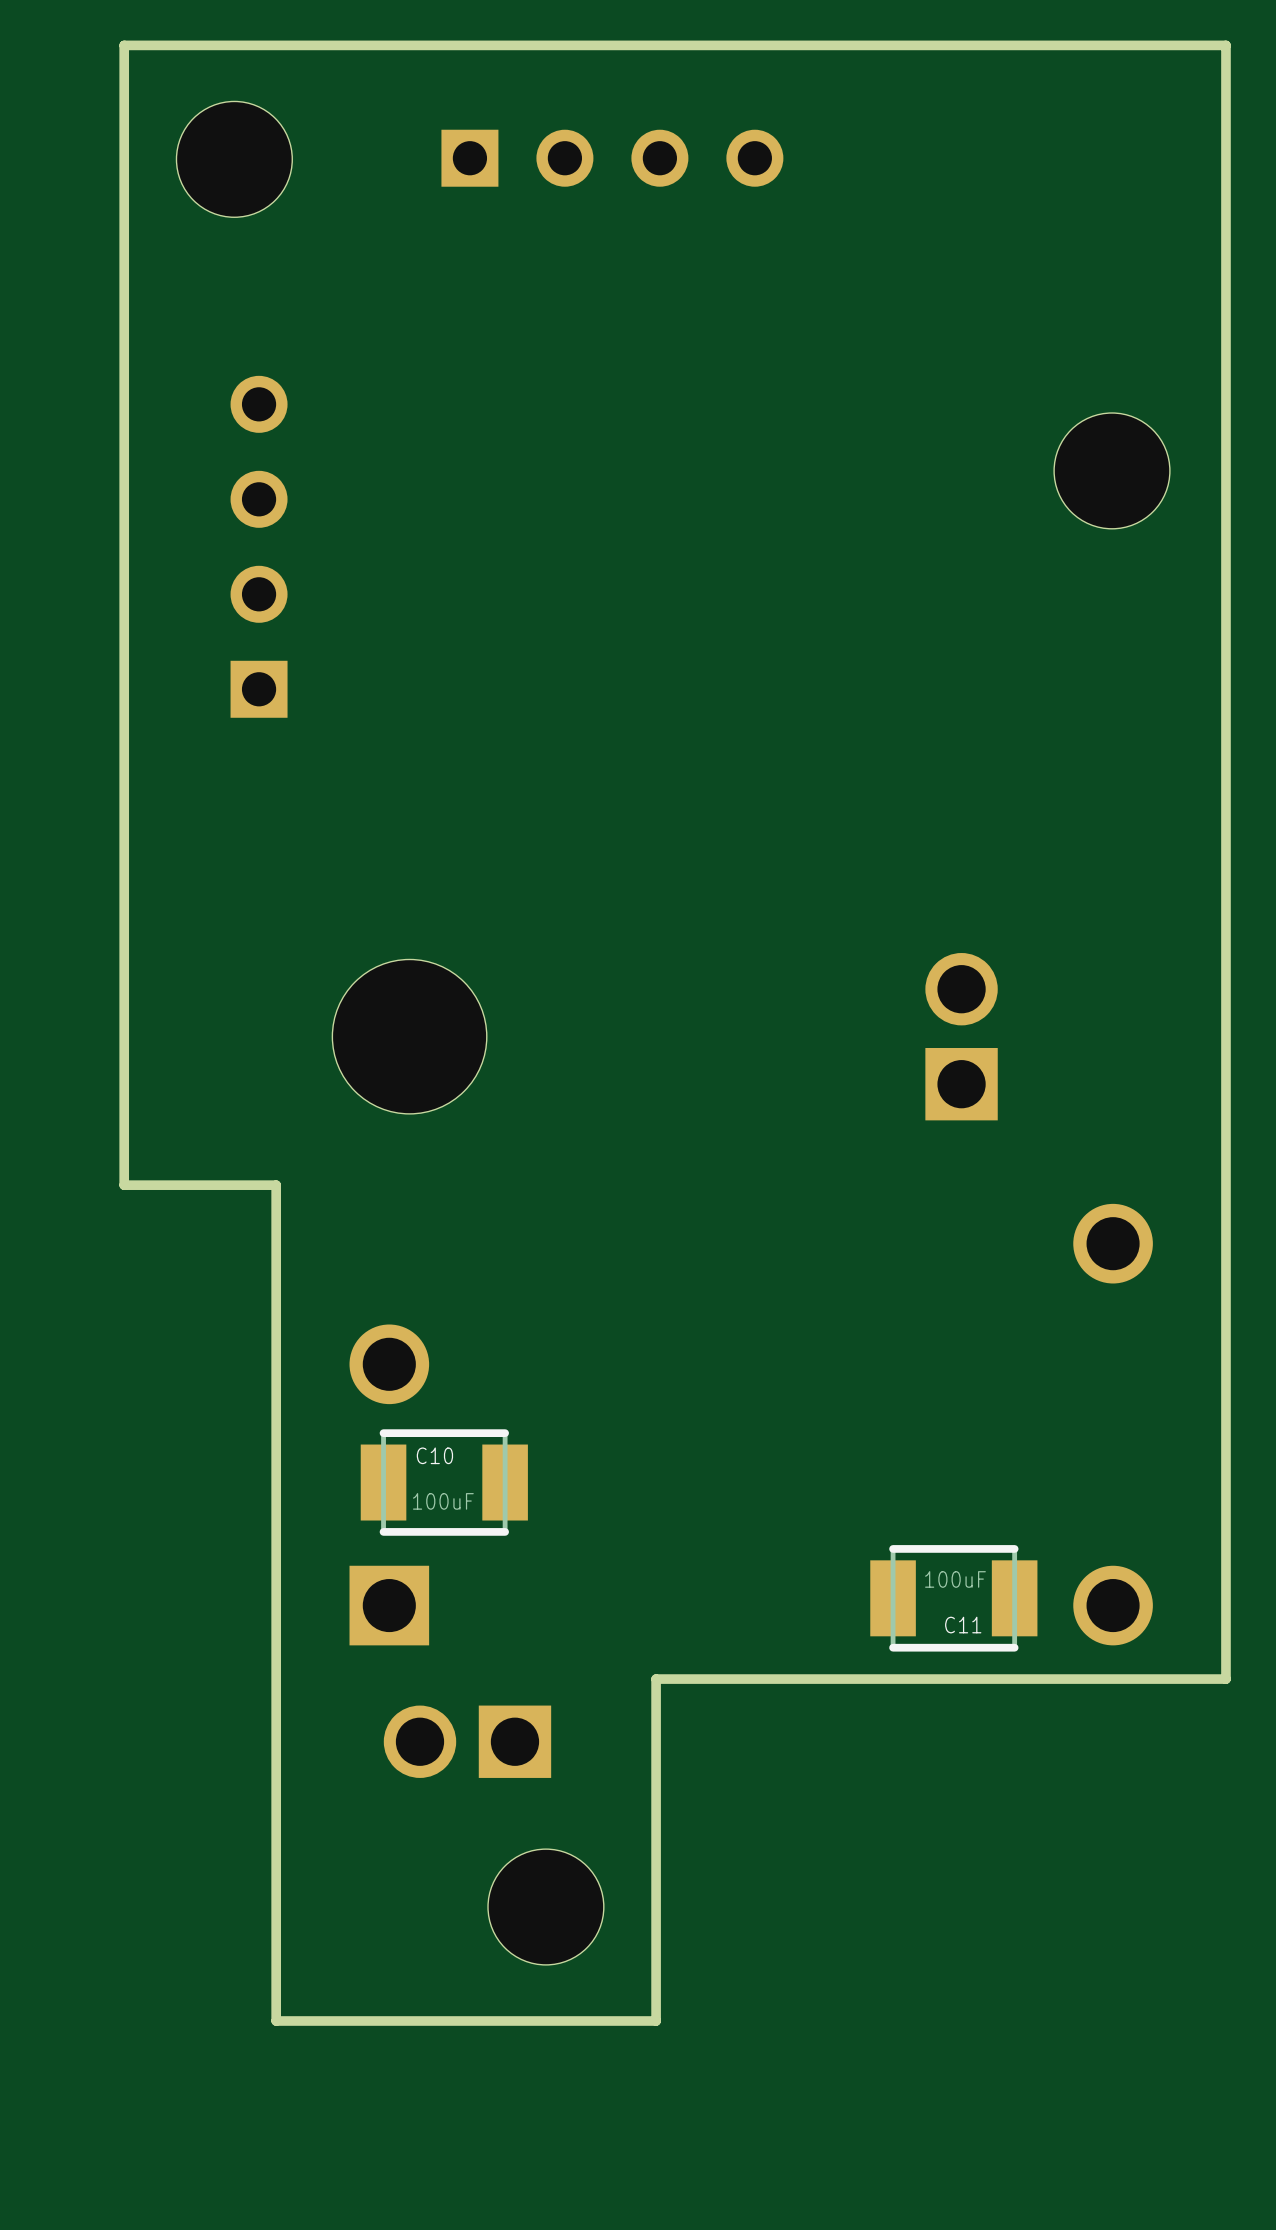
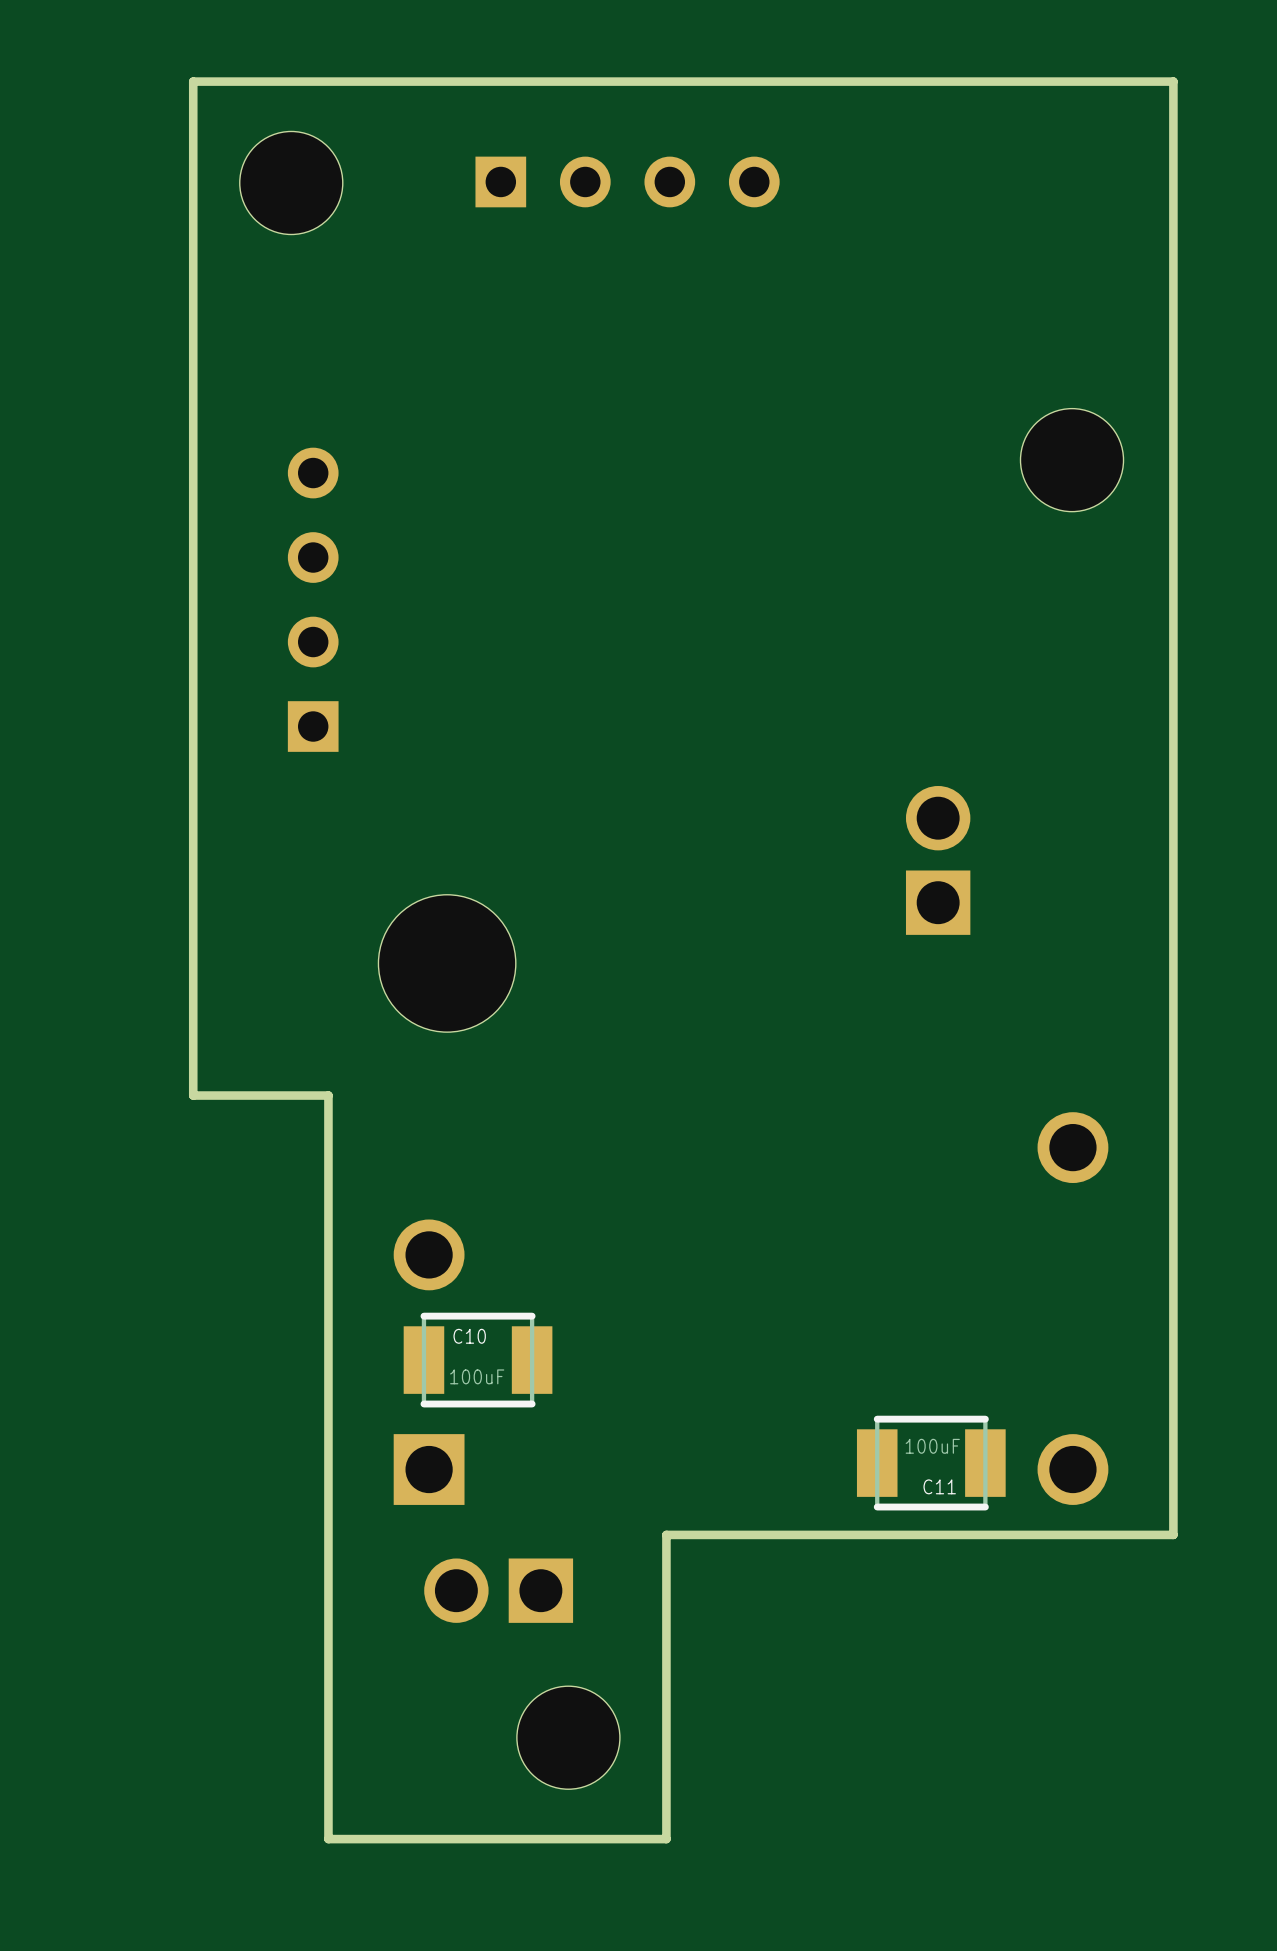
part position: (259, 546) -> (313, 599)
part position: (961, 1036) -> (938, 860)

